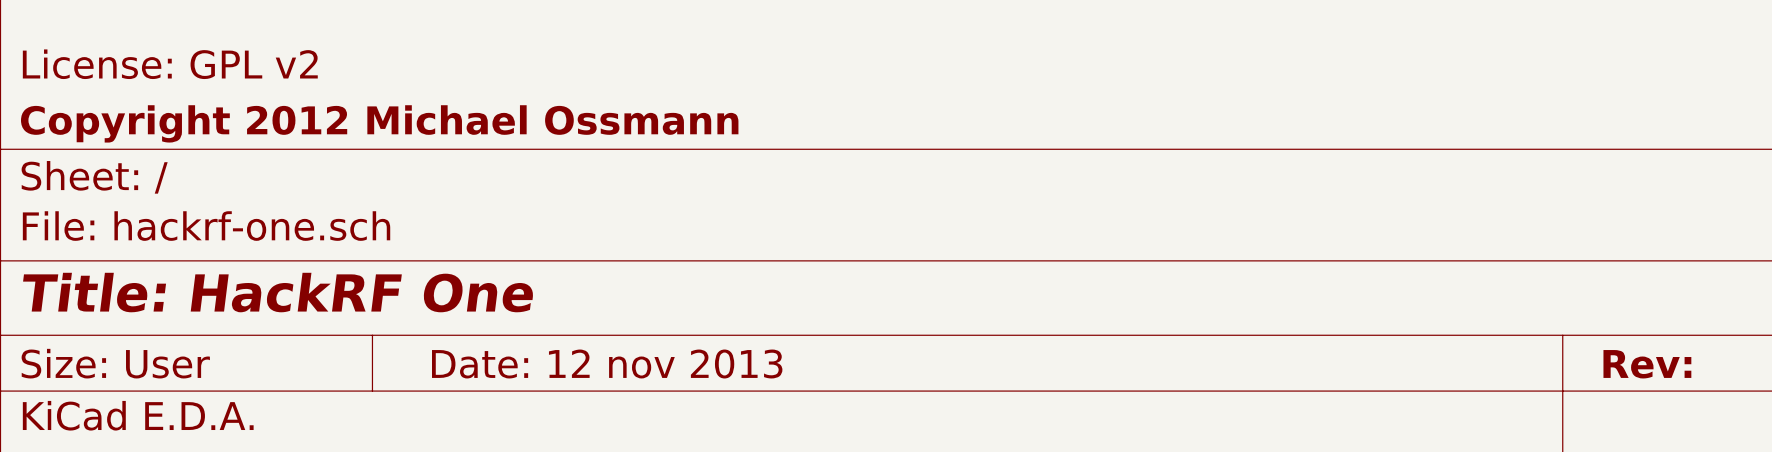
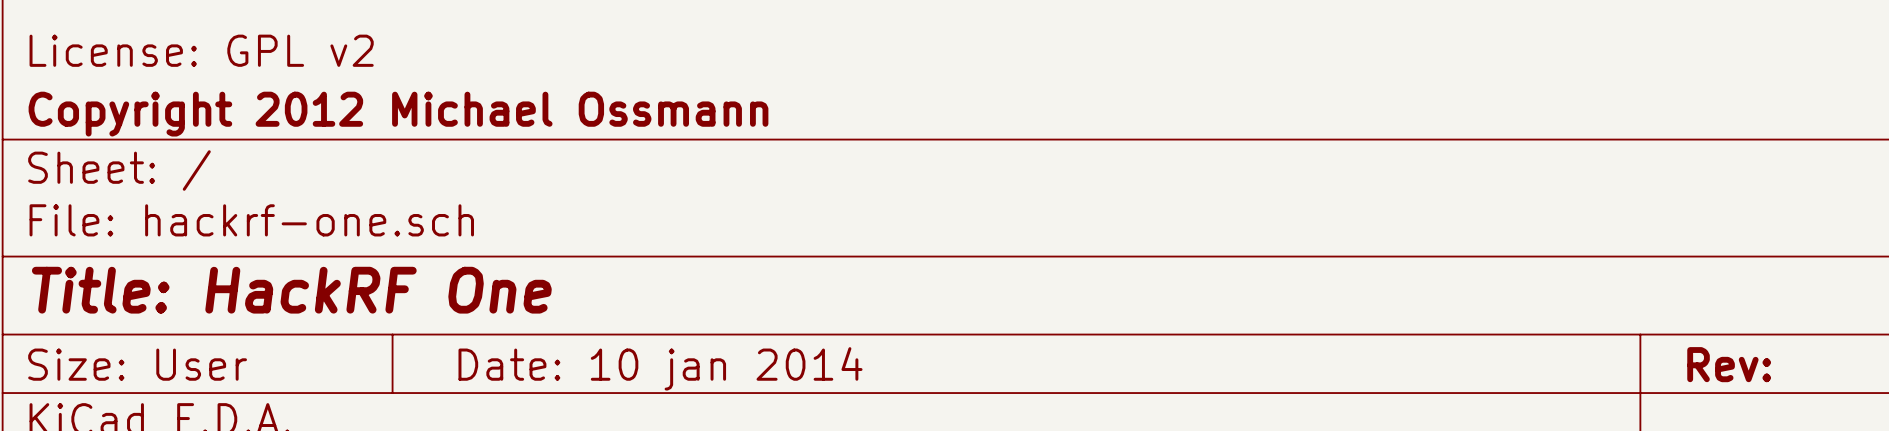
title block: Date: 12 nov 2013 (607, 364) -> Date: 10 jan 2014 (660, 368)

